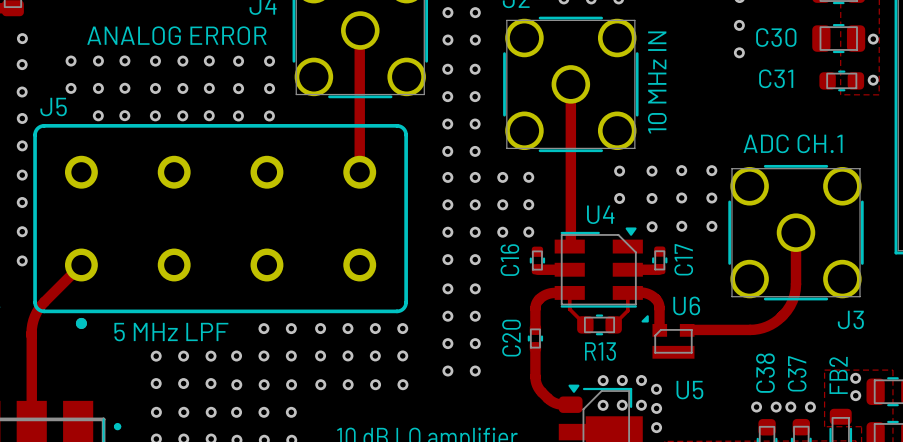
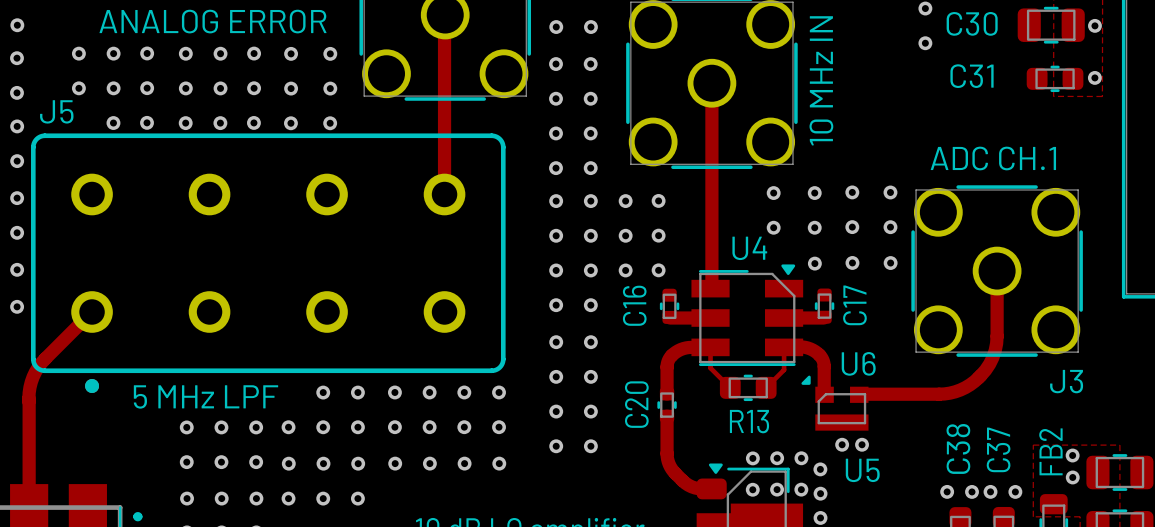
via: none -> (842, 444)
via: none -> (862, 444)

